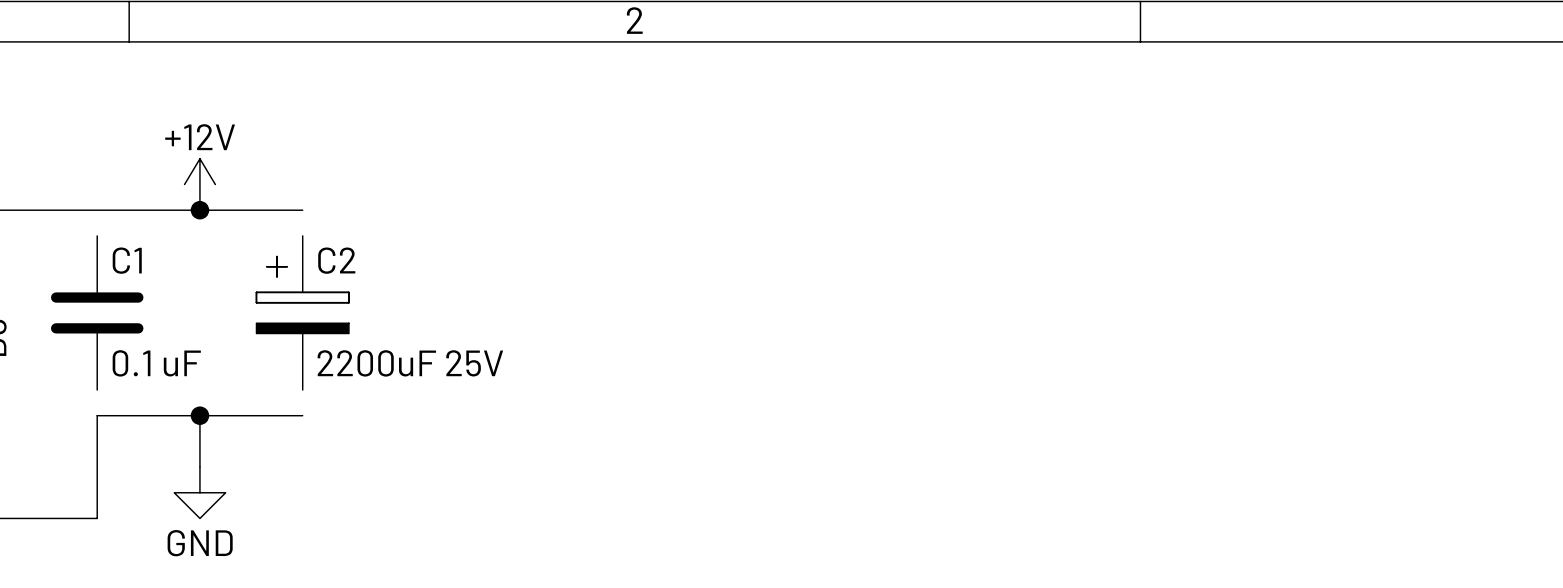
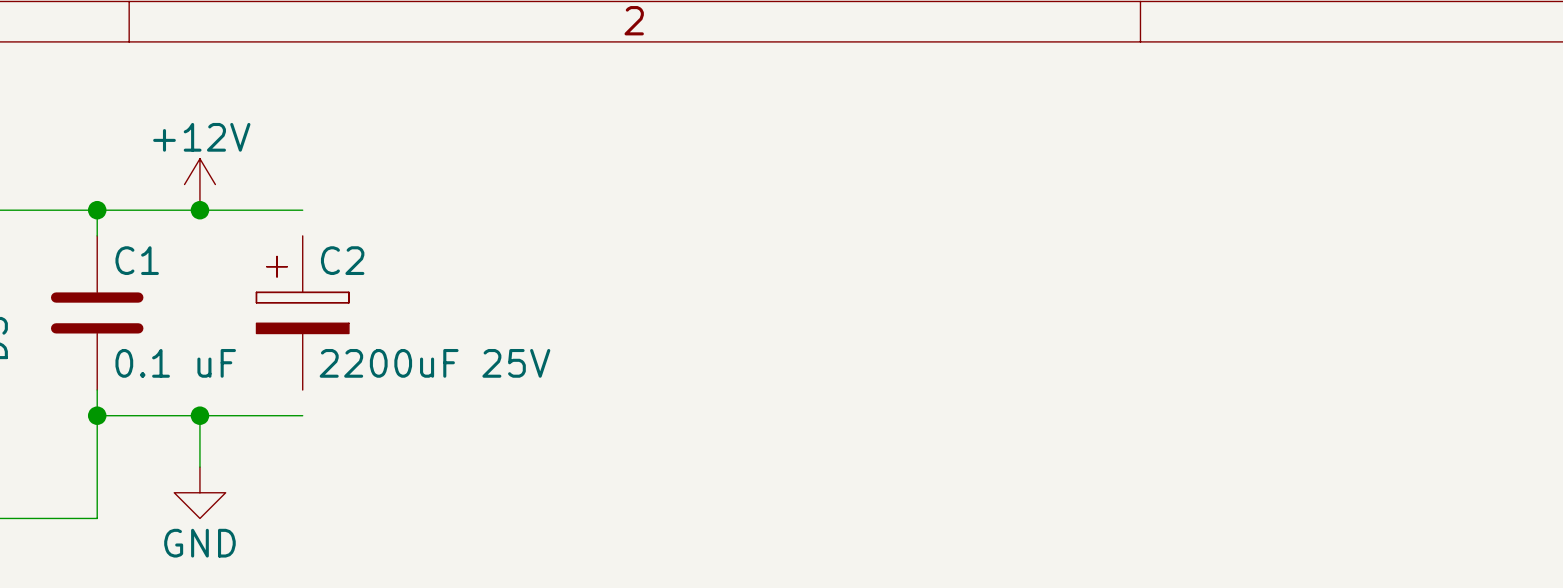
wire: none -> (97, 210) (97, 235)
junction: none -> (97, 210)
wire: none -> (97, 390) (97, 415)
junction: none -> (97, 415)

